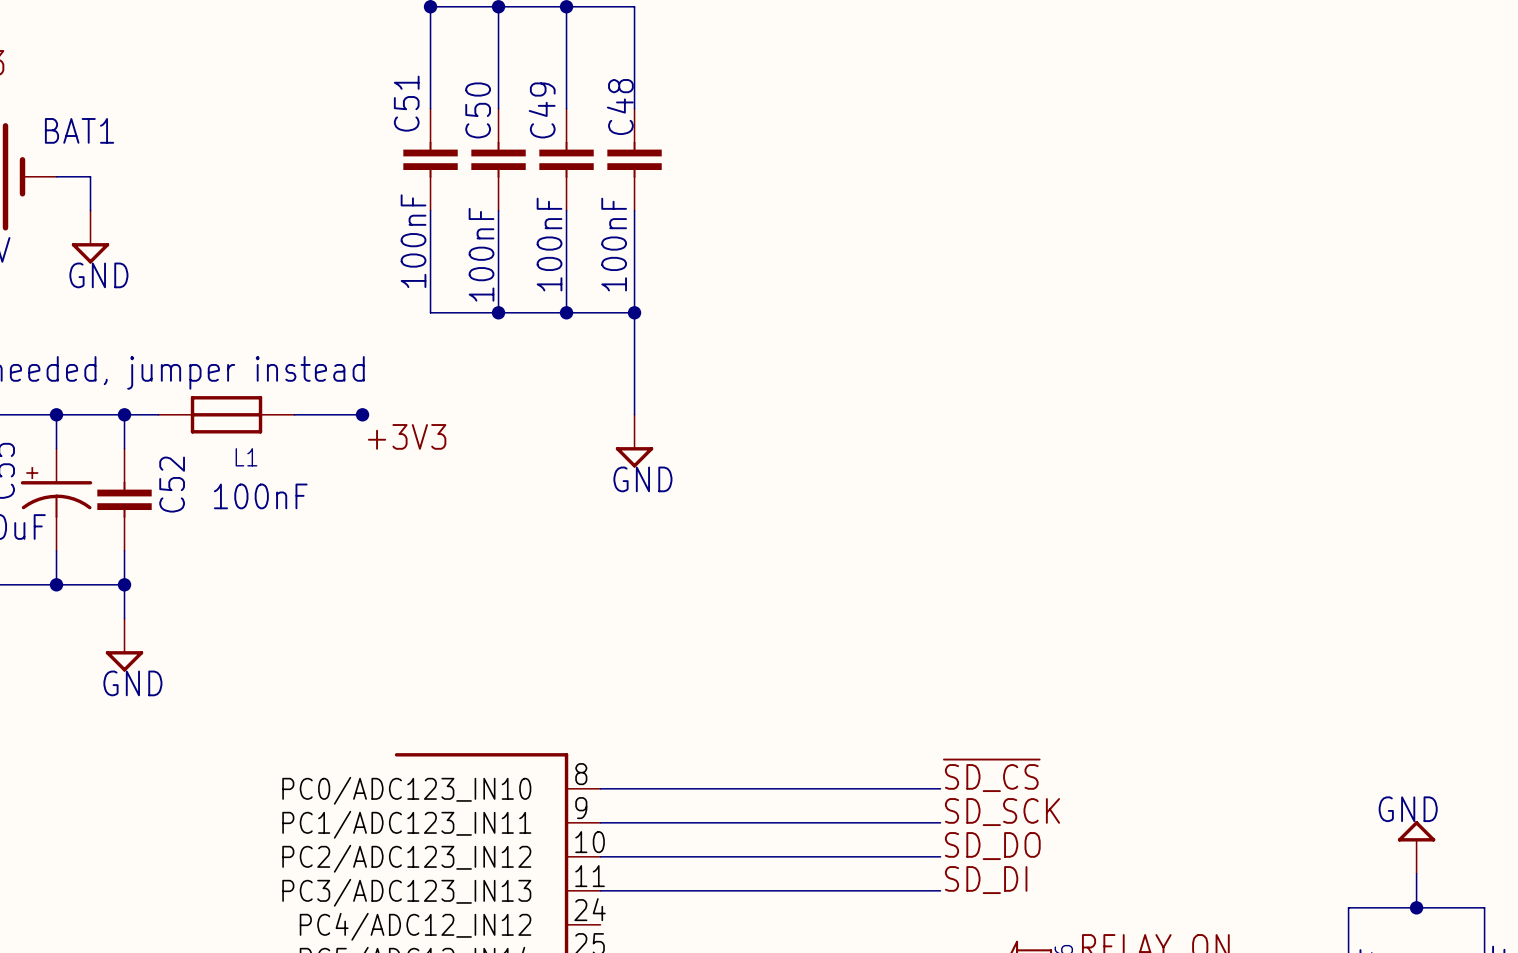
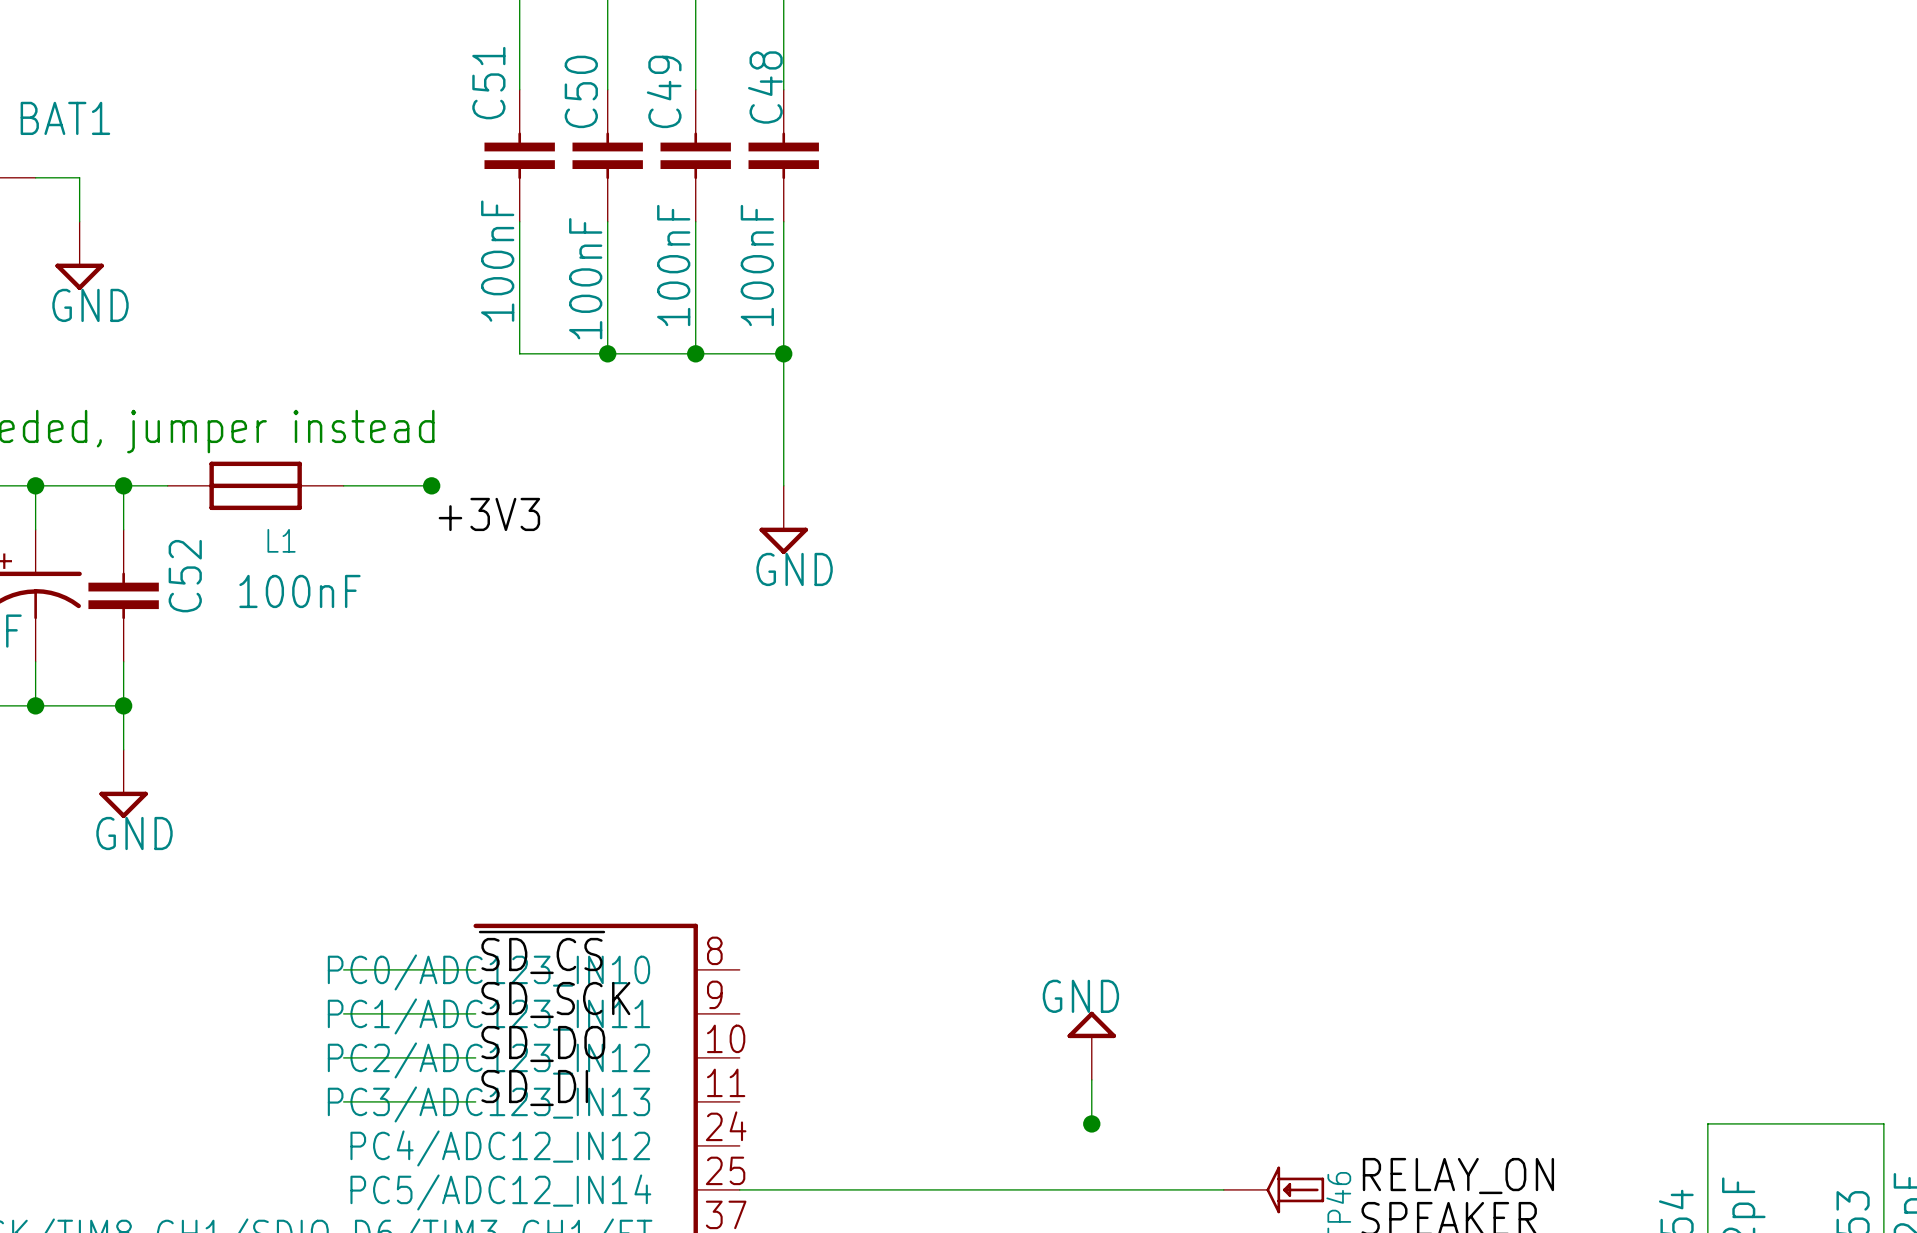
label: none -> ~{SD_CS} (541, 952)
label: ~{SD_CS} (991, 775) -> none
wire: none -> (343, 969) (475, 969)
wire: (600, 788) (940, 788) -> none
label: none -> SD_SCK (555, 999)
label: SD_SCK (1002, 812) -> none
wire: none -> (343, 1013) (475, 1013)
wire: (600, 822) (940, 822) -> none
label: none -> SD_DO (543, 1043)
label: SD_DO (992, 846) -> none
power symbol: none -> GND (1091, 1045)
power symbol: GND (1416, 847) -> none
wire: none -> (343, 1057) (475, 1057)
wire: (600, 856) (940, 856) -> none
wire: none -> (1091, 1079) (1091, 1123)
wire: (1416, 873) (1416, 907) -> none
label: none -> SD_DI (534, 1088)
label: SD_DI (986, 880) -> none
wire: none -> (343, 1101) (475, 1101)
wire: (600, 890) (940, 890) -> none
junction: none -> (1091, 1123)
junction: (1416, 907) -> none

